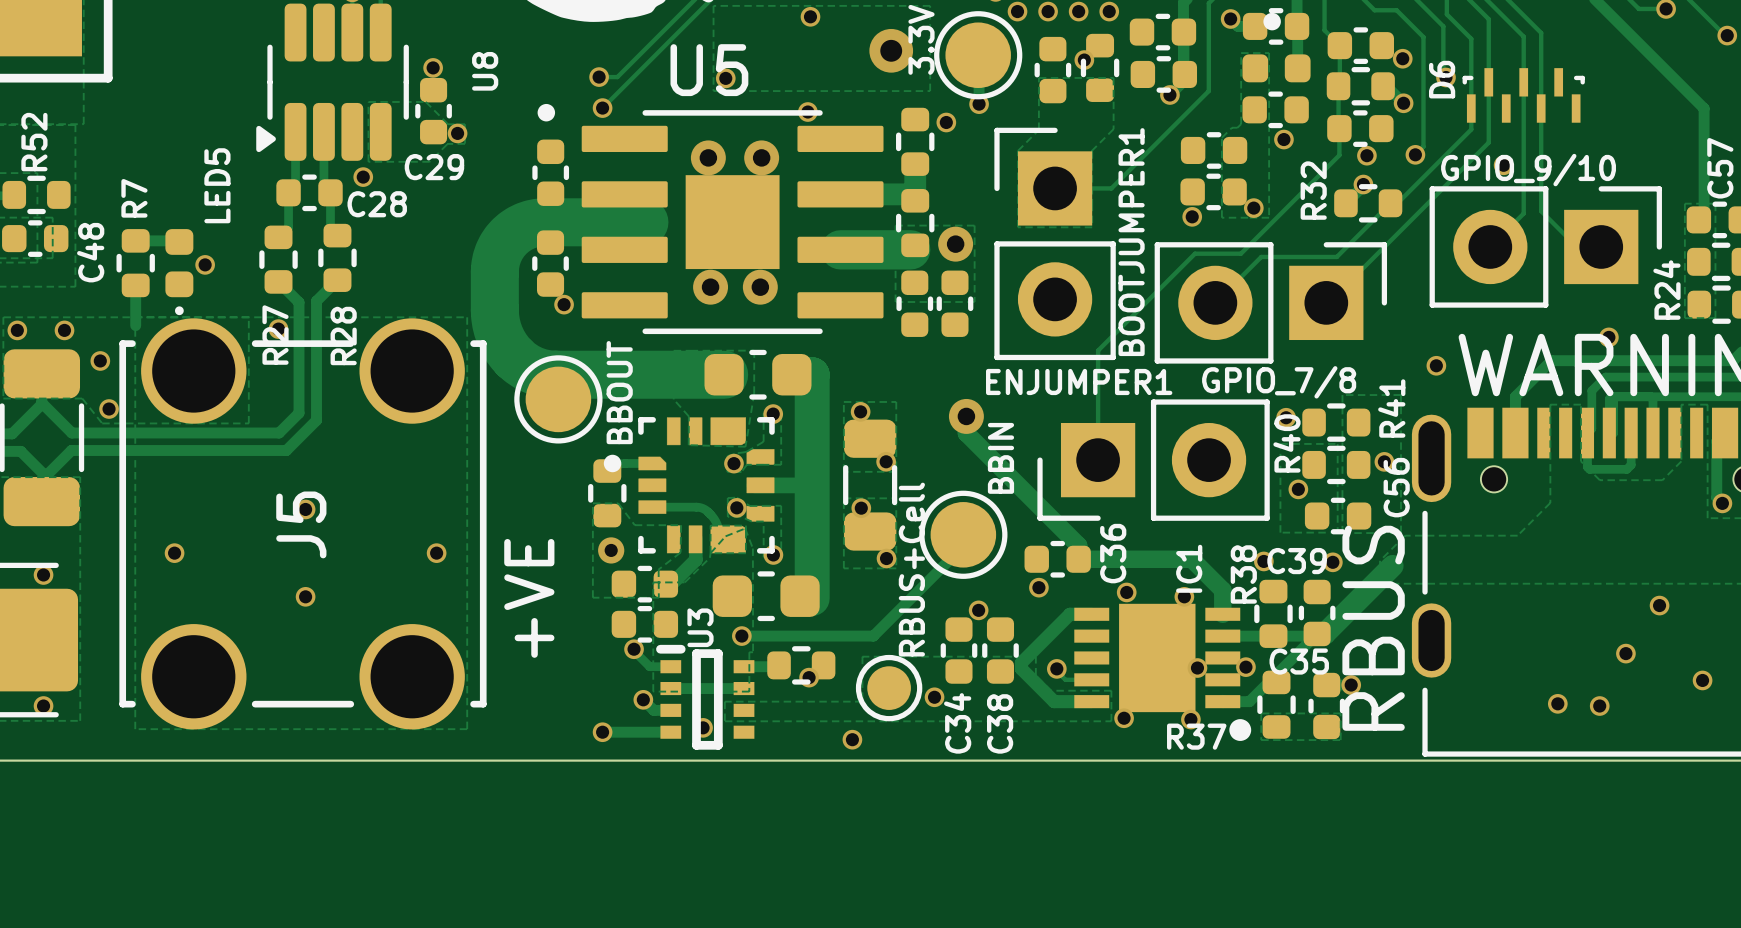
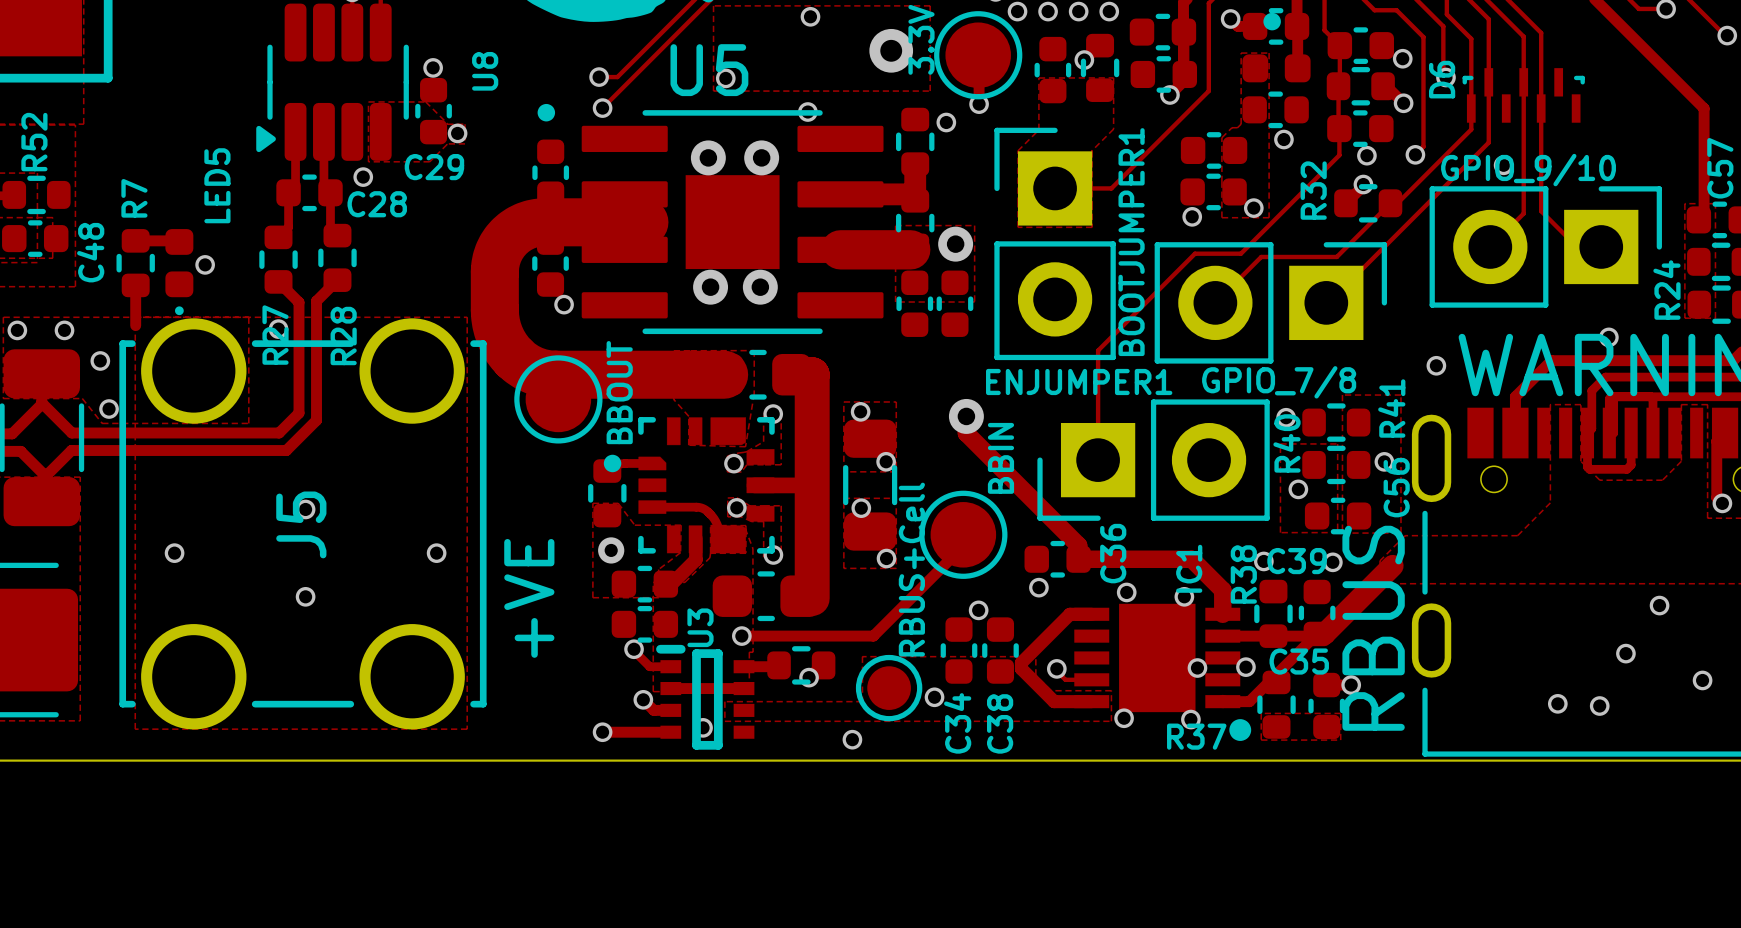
via: (43, 574) -> none
via: (43, 706) -> none

